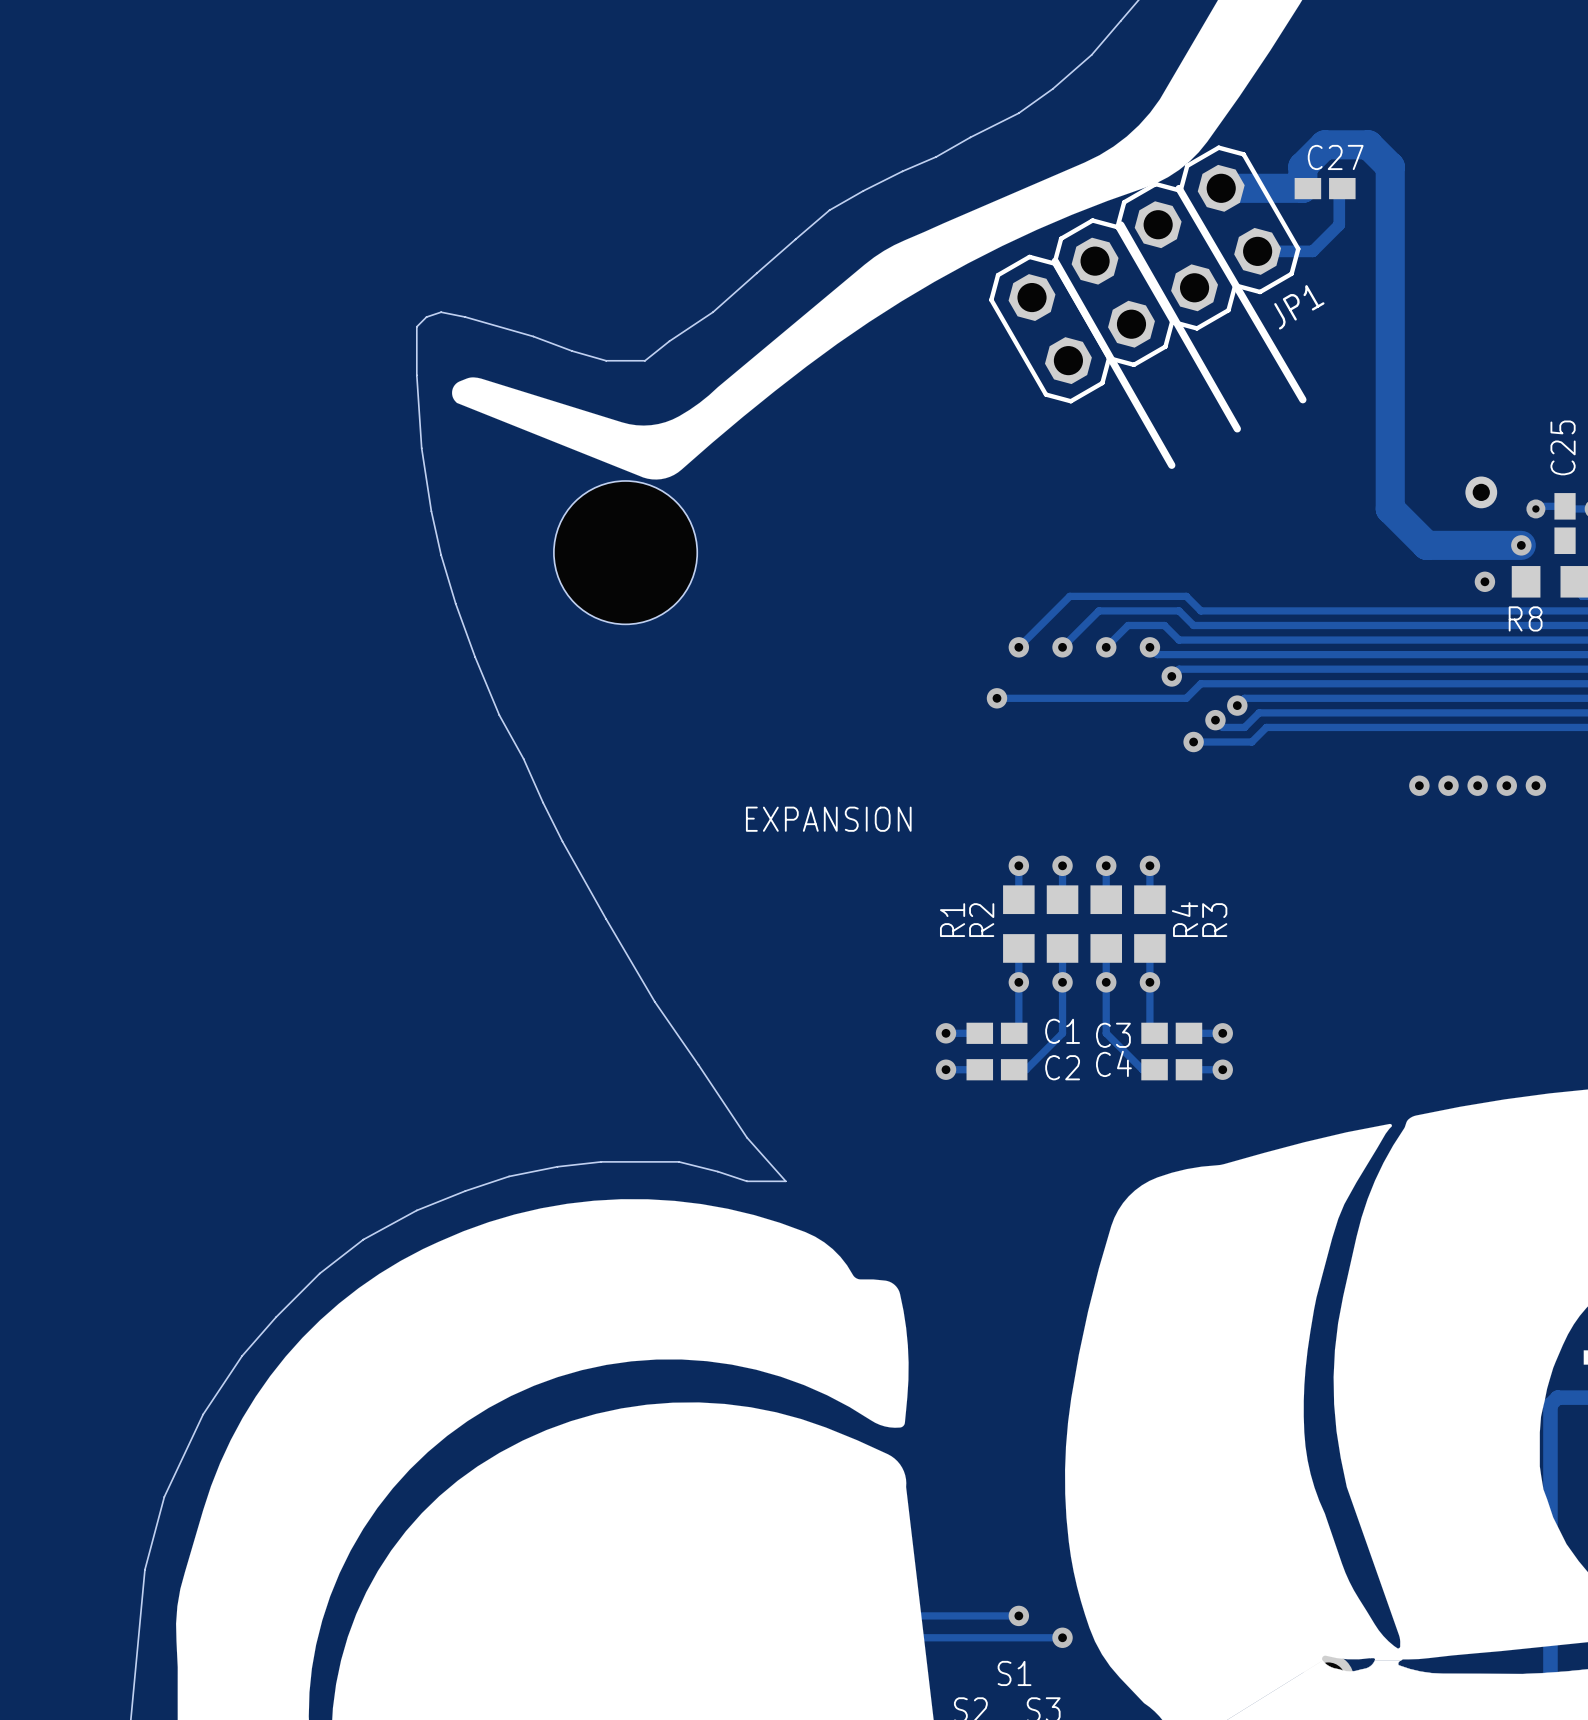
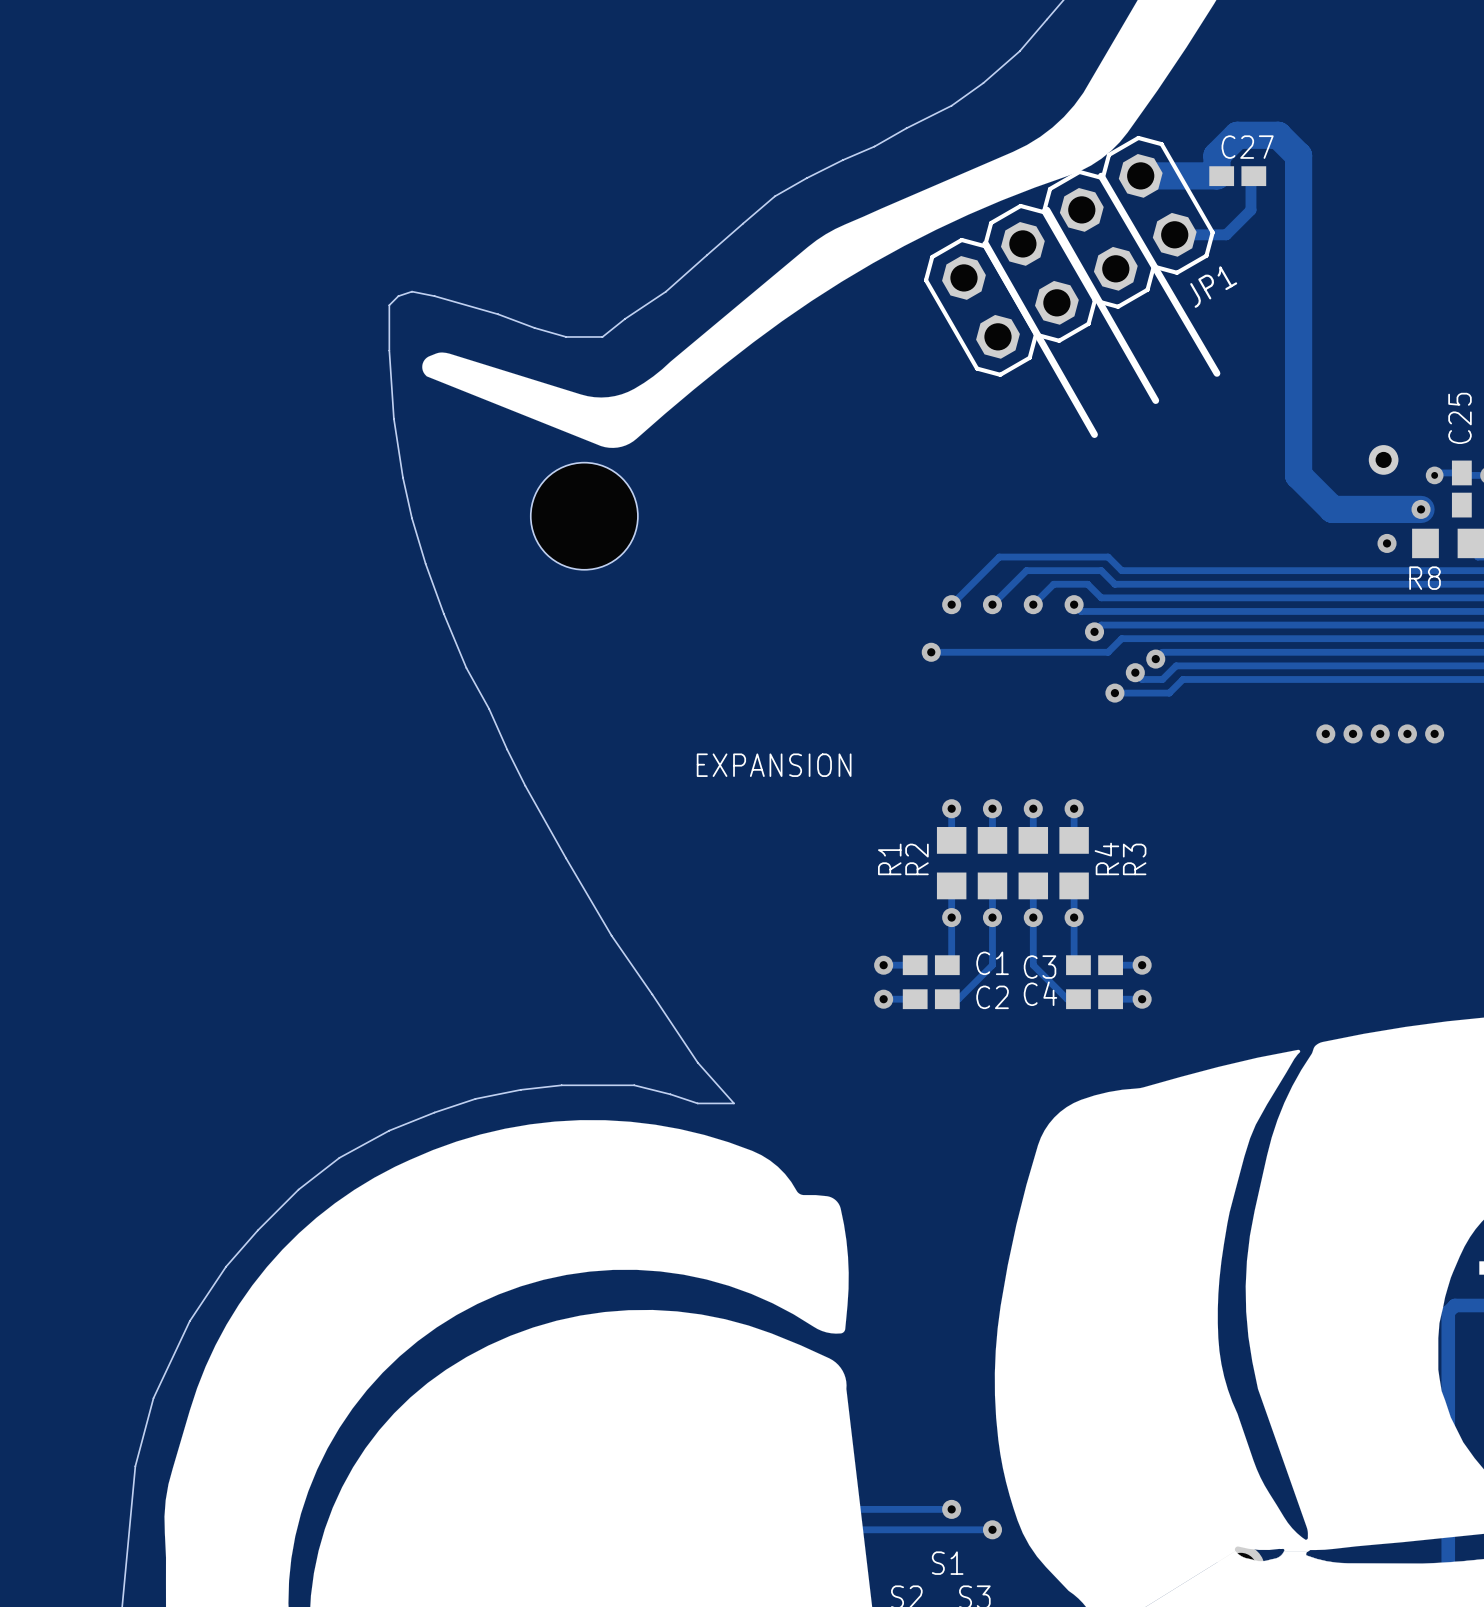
hole size: [553, 480, 698, 625] -> [530, 462, 638, 570]

